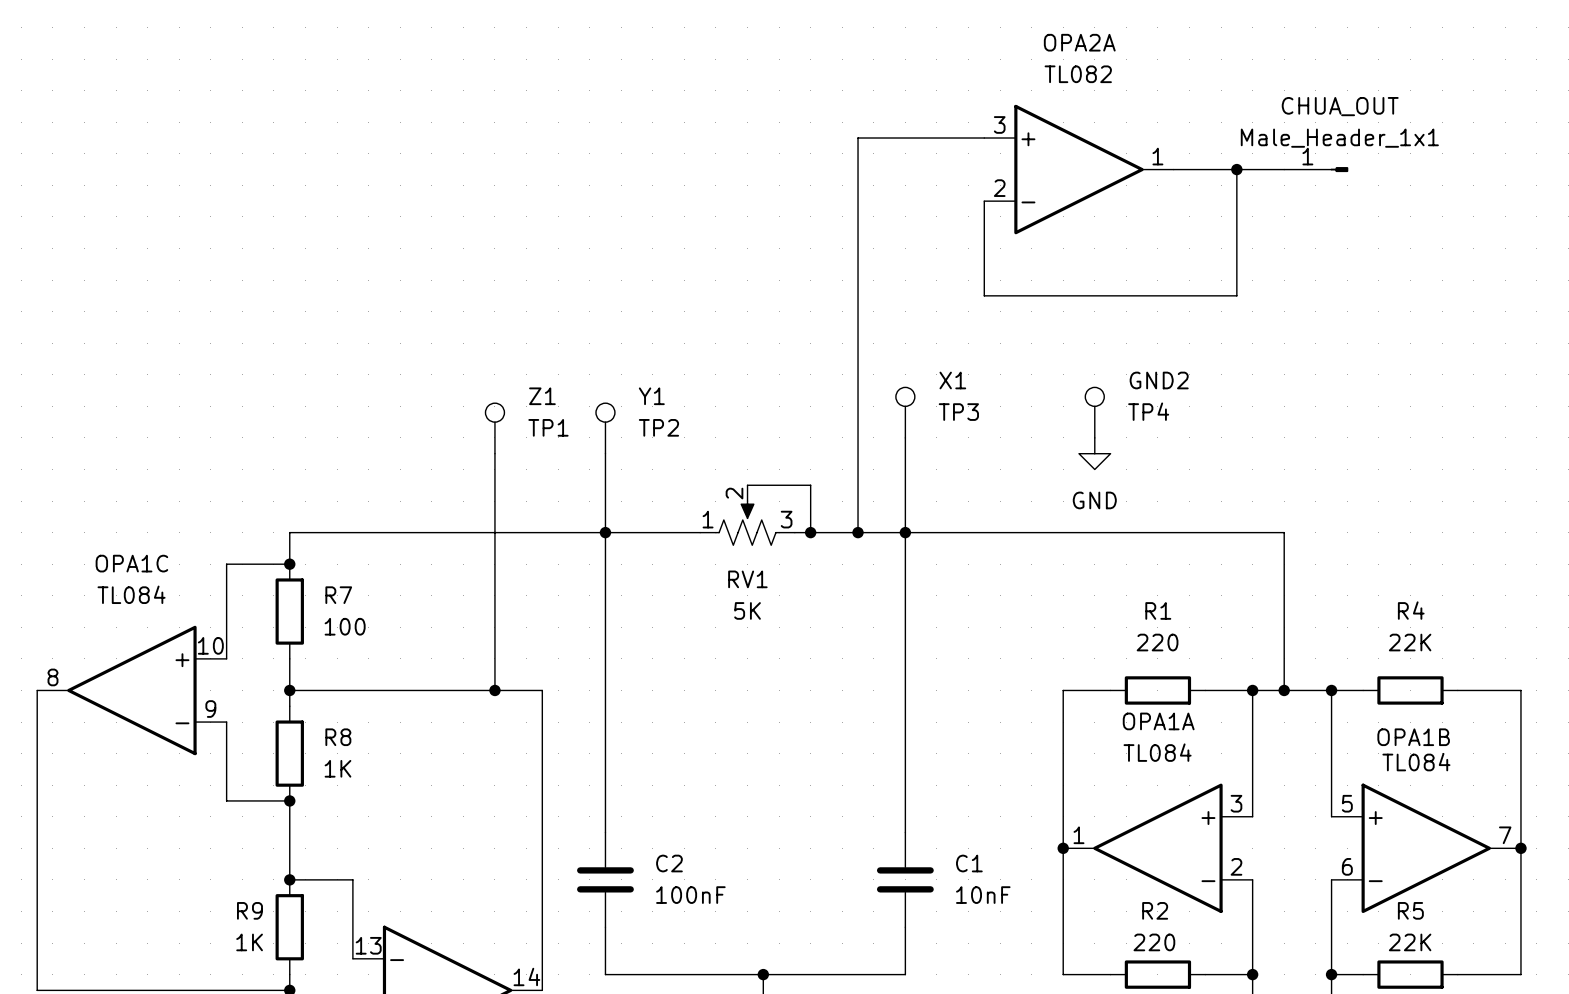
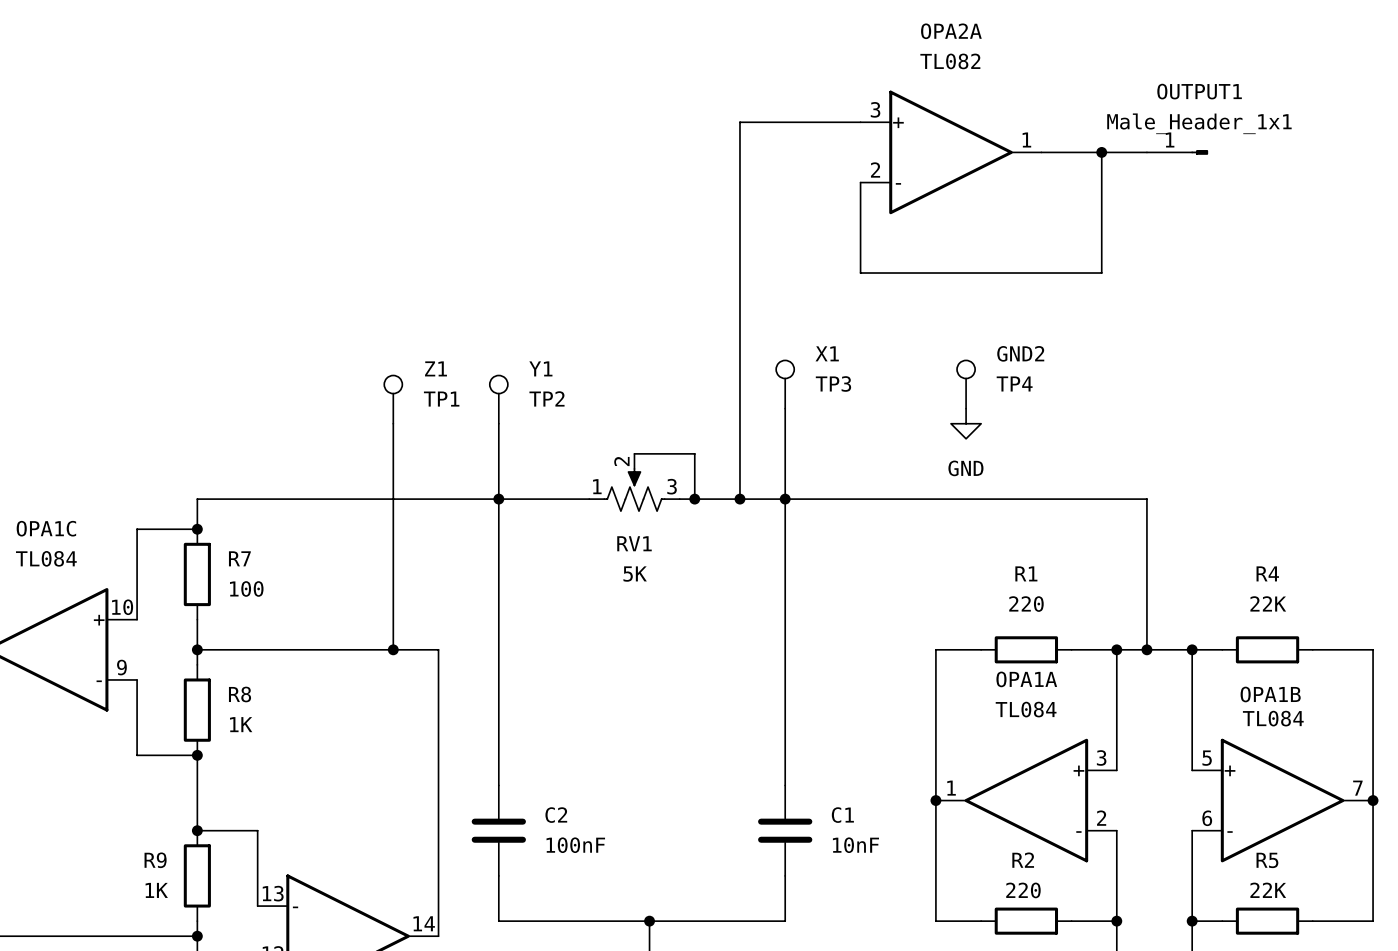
CHUA_OUT name: CHUA_OUT (1340, 106) -> OUTPUT1 (1199, 91)

